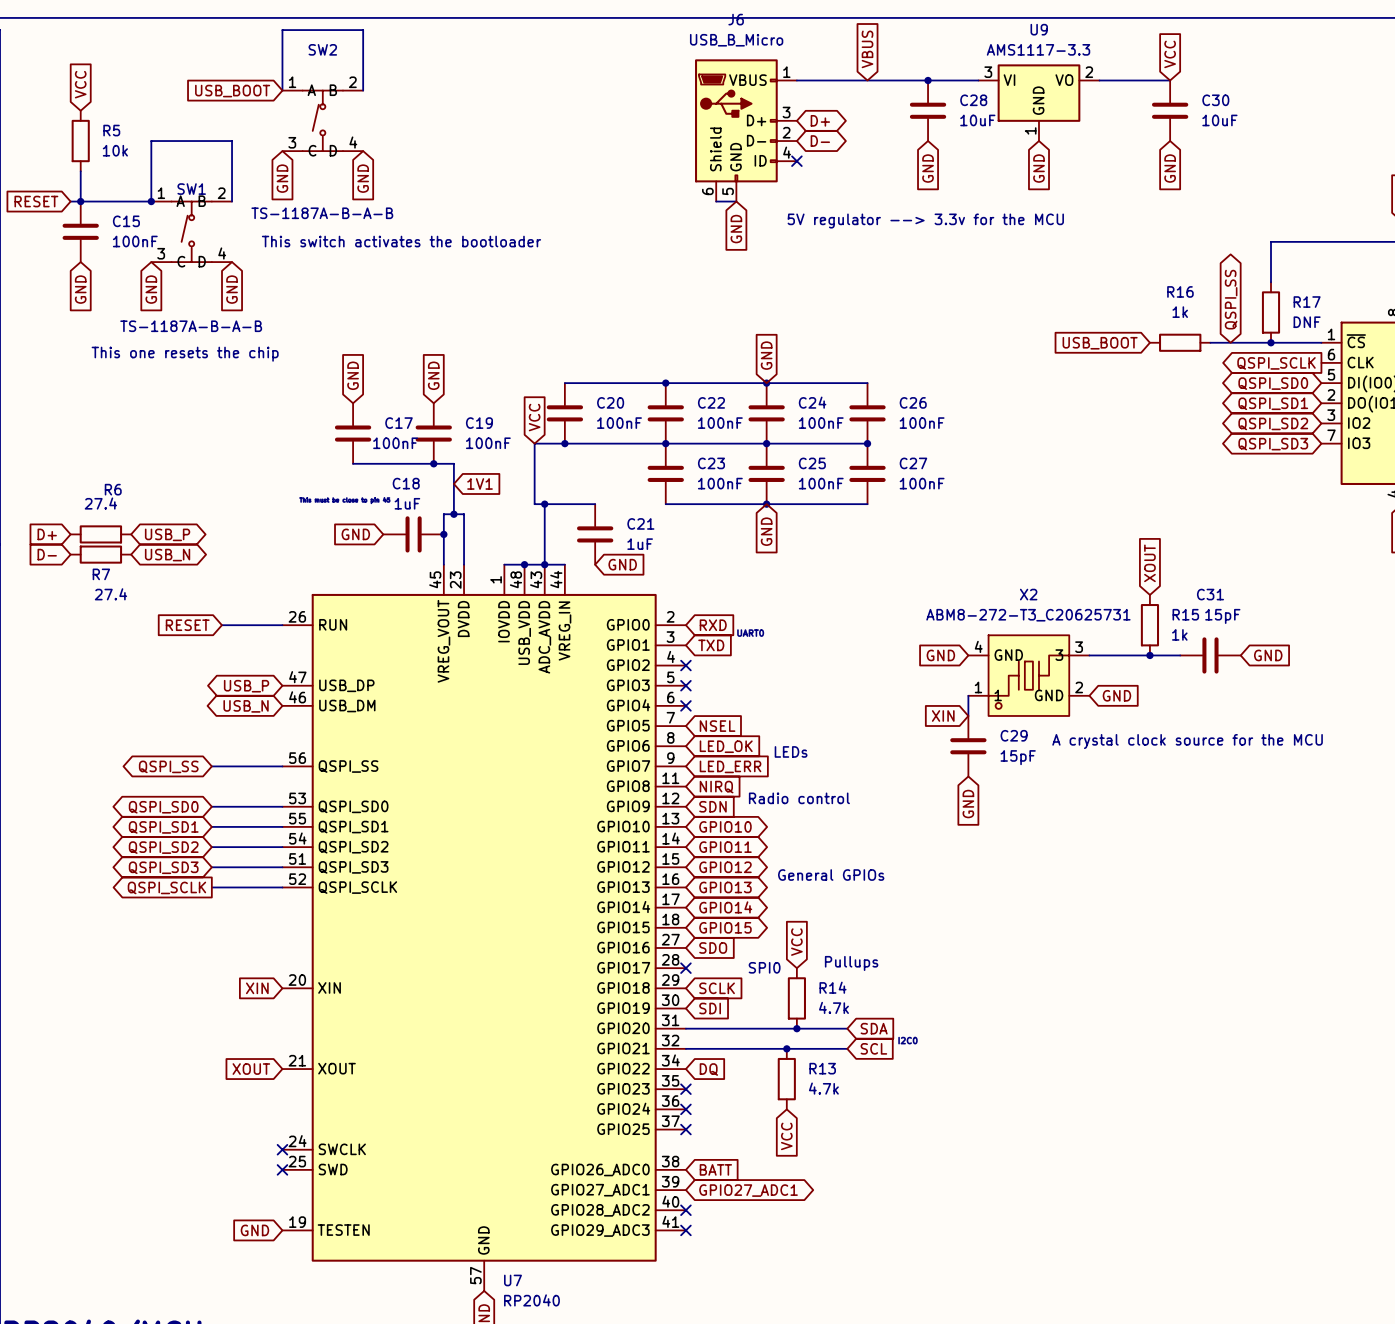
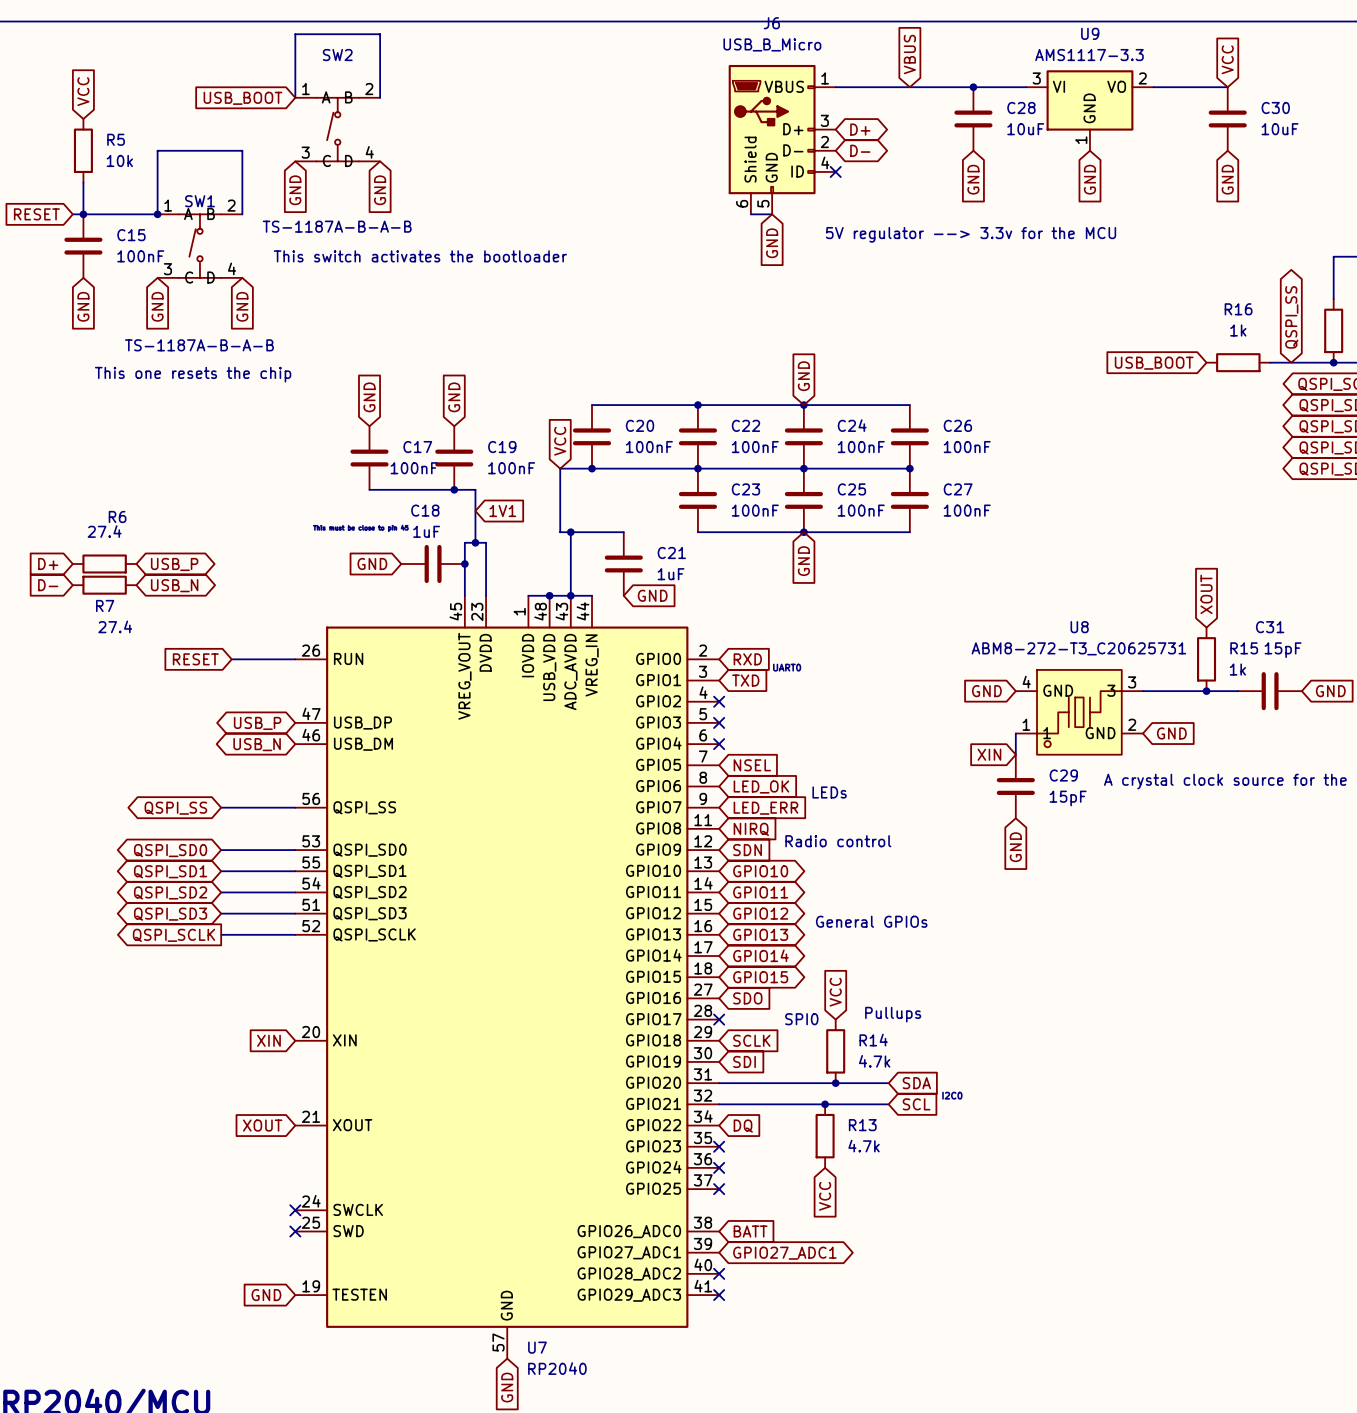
X2 name: X2 (1028, 594) -> U8 (1079, 627)

